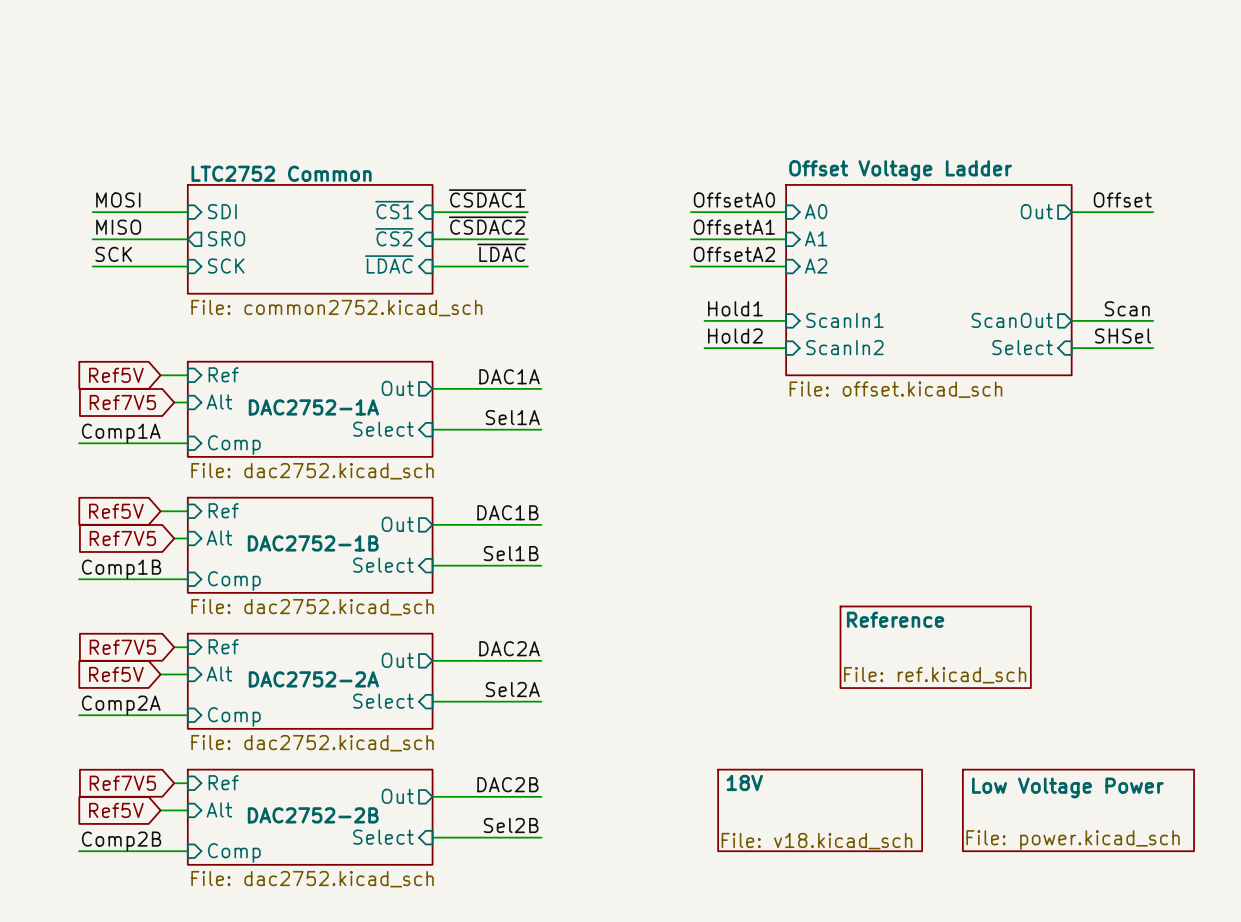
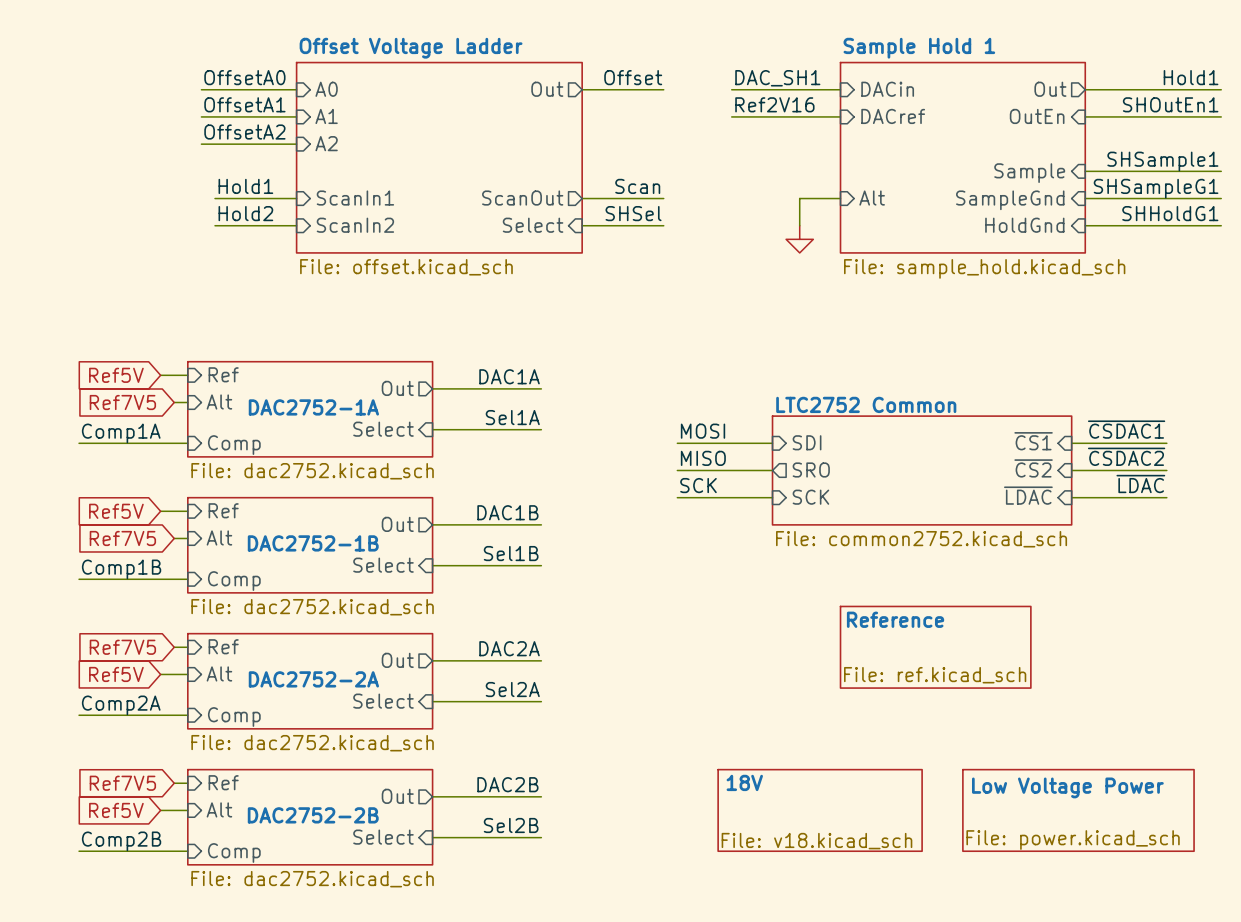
label: none -> OffsetA0 (244, 77)
label: none -> Offset (633, 77)
label: none -> Hold1 (1191, 77)
label: none -> DAC_SH1 (777, 78)
sheet pin: none -> A0 (326, 89)
sheet pin: none -> Out (547, 89)
wire: none -> (582, 89) (663, 89)
wire: none -> (731, 89) (840, 89)
sheet pin: none -> DACin (887, 89)
wire: none -> (1085, 89) (1221, 89)
label: none -> OffsetA1 (244, 104)
label: none -> Ref2V16 (774, 104)
label: none -> SHOutEn1 (1170, 104)
sheet pin: none -> A1 (326, 116)
wire: none -> (731, 116) (840, 116)
sheet pin: none -> DACref (893, 116)
sheet pin: none -> OutEn (1037, 116)
wire: none -> (1085, 116) (1221, 116)
label: none -> OffsetA2 (244, 132)
sheet pin: none -> A2 (326, 143)
sheet Offset Voltage Ladder: none -> File: offset.kicad_sch (439, 157)
sheet Sample Hold 1: none -> File: sample_hold.kicad_sch (962, 157)
label: none -> SHSample1 (1162, 161)
wire: none -> (1085, 171) (1221, 171)
sheet LTC2752 Common name position: LTC2752 Common (281, 173) -> LTC2752 Common (866, 404)
sheet pin: none -> Sample (1029, 173)
sheet LTC2752 Common shape: [187, 184, 434, 295] -> [771, 415, 1073, 526]
label: none -> Hold1 (245, 186)
label: none -> Scan (637, 186)
label: none -> SHSampleG1 (1156, 188)
wire: none -> (215, 198) (296, 198)
sheet pin: none -> ScanIn1 (355, 198)
label: ~{CSDAC1} (487, 198) -> none
sheet pin: none -> ScanOut (522, 198)
wire: none -> (840, 198) (799, 198) (799, 225)
sheet pin: none -> Alt (872, 198)
wire: none -> (1085, 198) (1221, 198)
label: MOSI (118, 200) -> none
label: OffsetA0 (734, 200) -> none
sheet pin: none -> SampleGnd (1010, 200)
label: Offset (1122, 200) -> none
sheet pin: ~{CS1} (394, 210) -> none
sheet pin: SDI (222, 211) -> none
sheet pin: A0 (816, 211) -> none
sheet pin position: Out (1036, 211) -> Out (1050, 89)
wire: (92, 212) (187, 212) -> (201, 89) (296, 89)
wire: (432, 212) (527, 212) -> none
wire: (690, 212) (786, 212) -> (677, 443) (772, 443)
wire: (1071, 212) (1153, 212) -> none
label: none -> Hold2 (245, 213)
label: none -> SHSel (633, 213)
label: none -> SHHoldG1 (1170, 213)
wire: none -> (215, 225) (296, 225)
sheet pin: none -> ScanIn2 (355, 225)
label: ~{CSDAC2} (487, 225) -> none
sheet pin: none -> Select (533, 225)
sheet pin: none -> HoldGnd (1024, 225)
wire: none -> (1085, 225) (1221, 225)
label: MISO (118, 227) -> none
label: OffsetA1 (734, 227) -> none
sheet pin: ~{CS2} (394, 237) -> none
sheet pin: SRO (226, 238) -> none
sheet pin: A1 (816, 238) -> none
wire: (92, 239) (187, 239) -> (201, 116) (296, 116)
wire: (432, 239) (527, 239) -> none
wire: (690, 239) (786, 239) -> (677, 470) (772, 470)
power symbol: none -> (799, 239)
label: ~{LDAC} (501, 252) -> none
label: SCK (113, 254) -> none
label: OffsetA2 (734, 254) -> none
sheet pin: ~{LDAC} (389, 264) -> none
wire: (92, 266) (187, 266) -> (201, 144) (296, 144)
sheet pin: SCK (226, 266) -> none
wire: (432, 266) (527, 266) -> none
wire: (690, 266) (786, 266) -> (677, 497) (772, 497)
sheet pin: A2 (816, 266) -> none
sheet Offset Voltage Ladder: File: offset.kicad_sch (928, 280) -> none
sheet LTC2752 Common value position: File: common2752.kicad_sch (336, 308) -> File: common2752.kicad_sch (921, 539)
label: Hold1 (735, 308) -> none
label: Scan (1127, 308) -> none
wire: (704, 320) (786, 320) -> (582, 198) (663, 198)
sheet pin: ScanIn1 (844, 320) -> none
sheet pin: ScanOut (1012, 320) -> none
wire: (1071, 320) (1153, 320) -> none
label: Hold2 (735, 335) -> none
label: SHSel (1123, 335) -> none
sheet pin: ScanIn2 (844, 347) -> none
sheet pin: Select (1022, 347) -> none
wire: (704, 348) (786, 348) -> (582, 225) (663, 225)
wire: (1071, 348) (1153, 348) -> none
label: none -> ~{CSDAC1} (1126, 429)
label: none -> MOSI (703, 431)
sheet pin: none -> ~{CS1} (1033, 441)
sheet pin: none -> SDI (807, 442)
wire: none -> (1071, 443) (1166, 443)
label: none -> ~{CSDAC2} (1126, 456)
label: none -> MISO (703, 458)
sheet pin: none -> ~{CS2} (1033, 468)
sheet pin: none -> SRO (811, 469)
wire: none -> (1071, 470) (1166, 470)
label: none -> ~{LDAC} (1140, 483)
label: none -> SCK (698, 485)
sheet pin: none -> ~{LDAC} (1028, 495)
sheet pin: none -> SCK (810, 497)
wire: none -> (1071, 497) (1166, 497)

